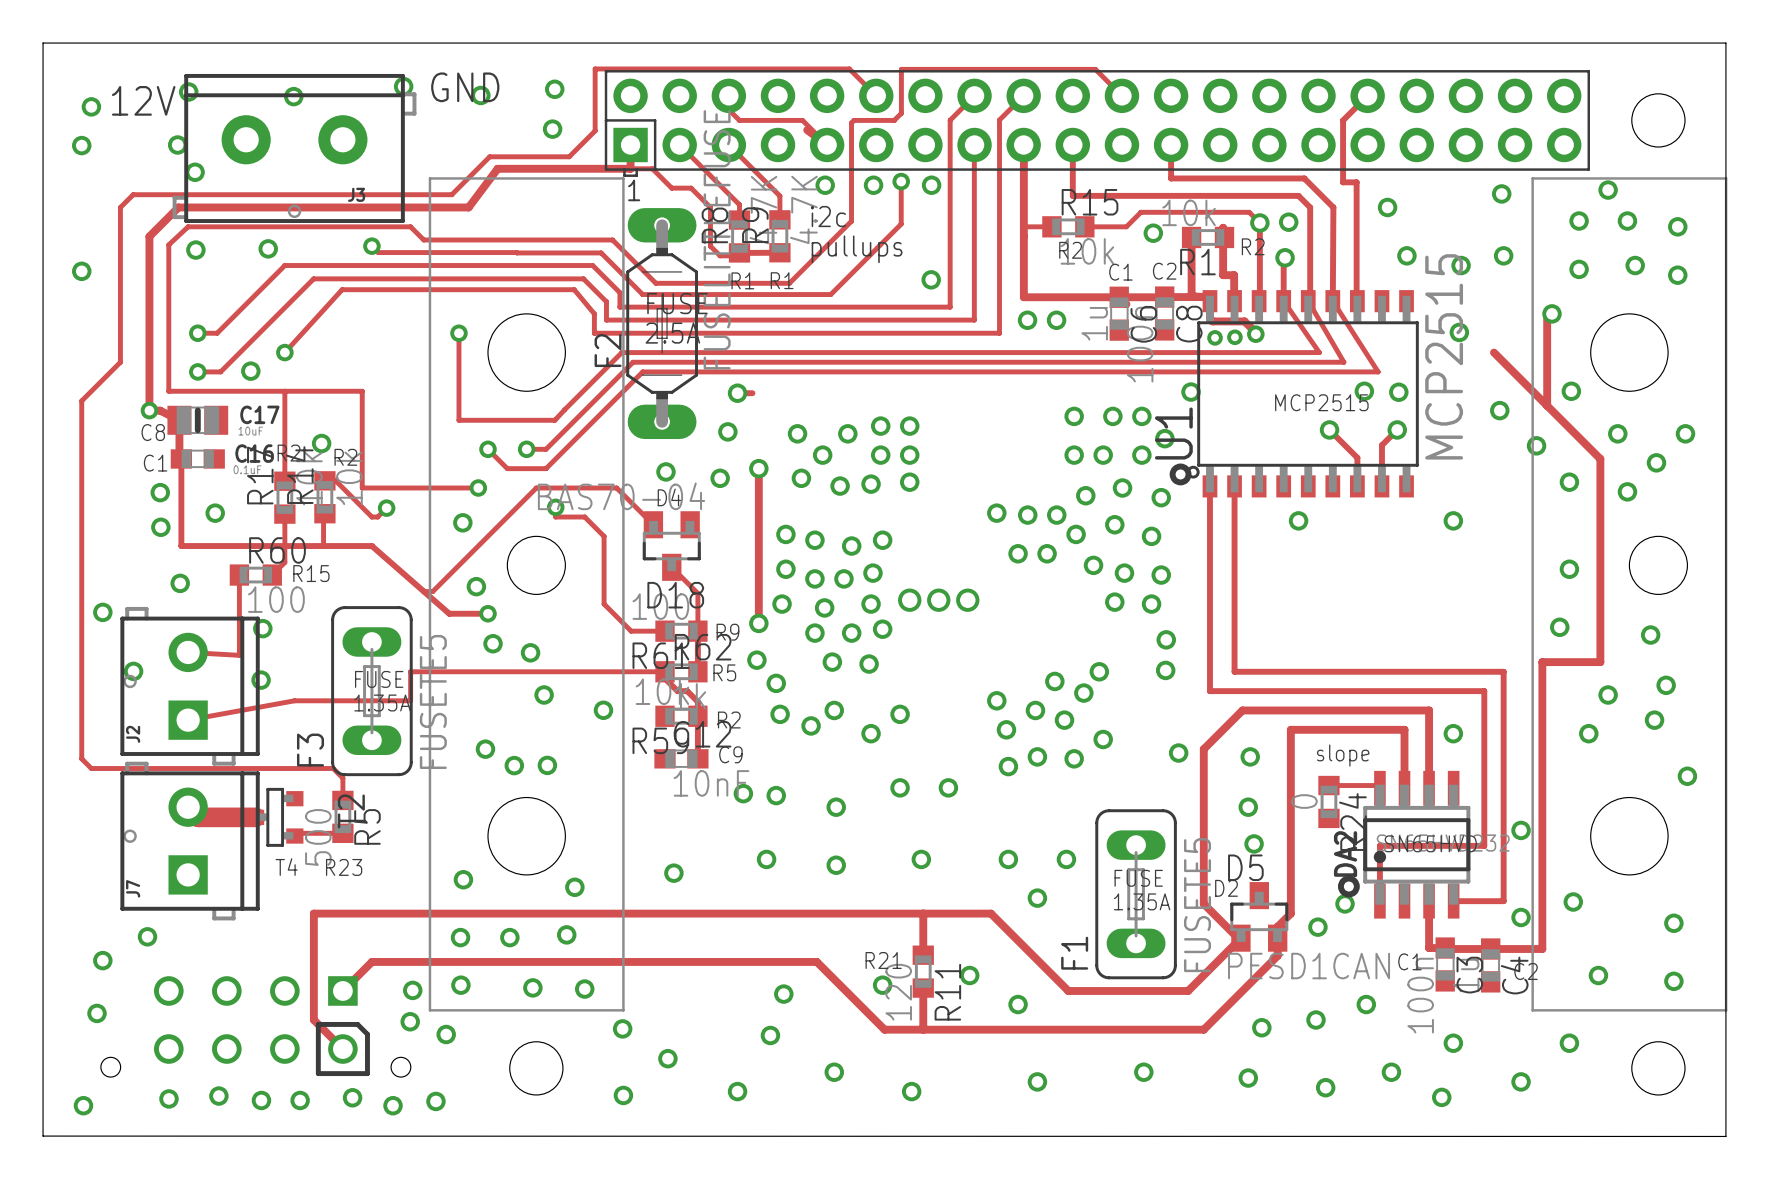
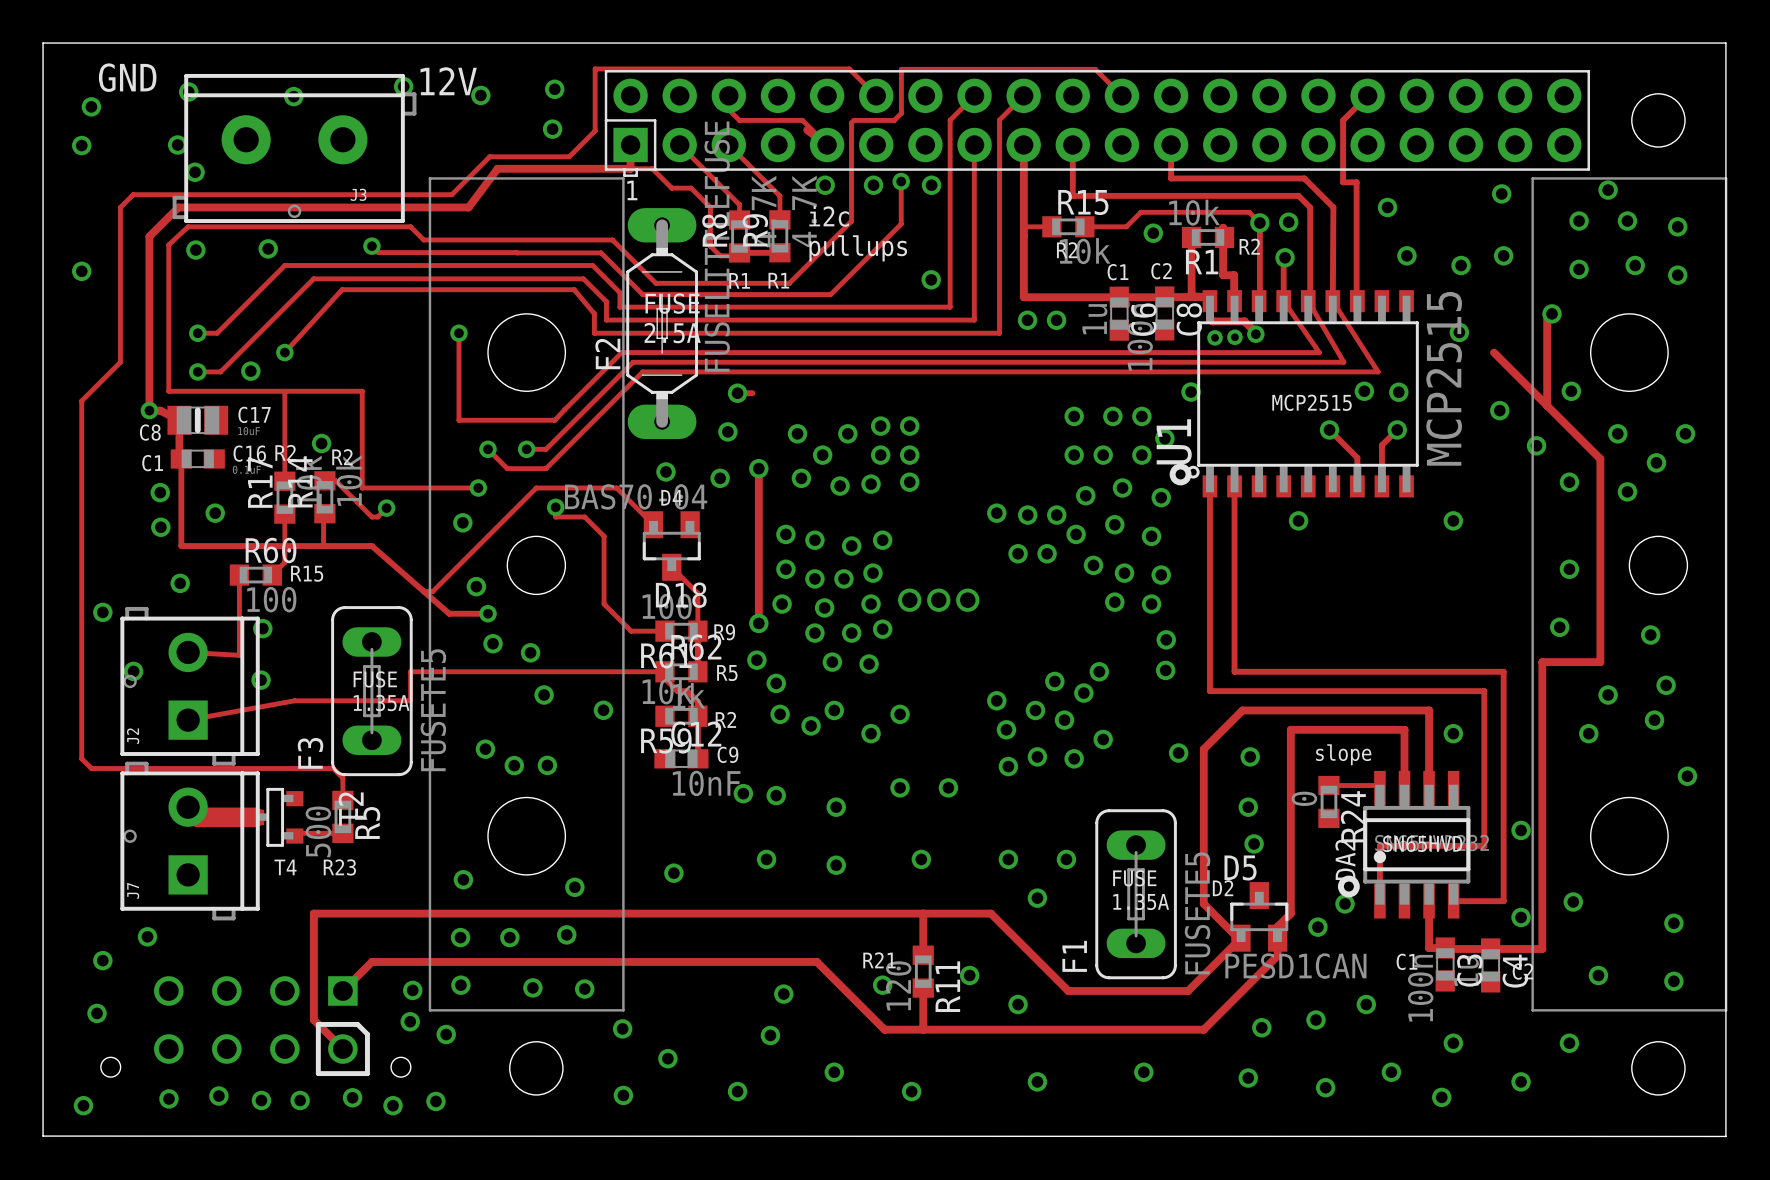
text position: GND (465, 87) -> GND (127, 77)
text position: 12V (143, 100) -> 12V (448, 81)

